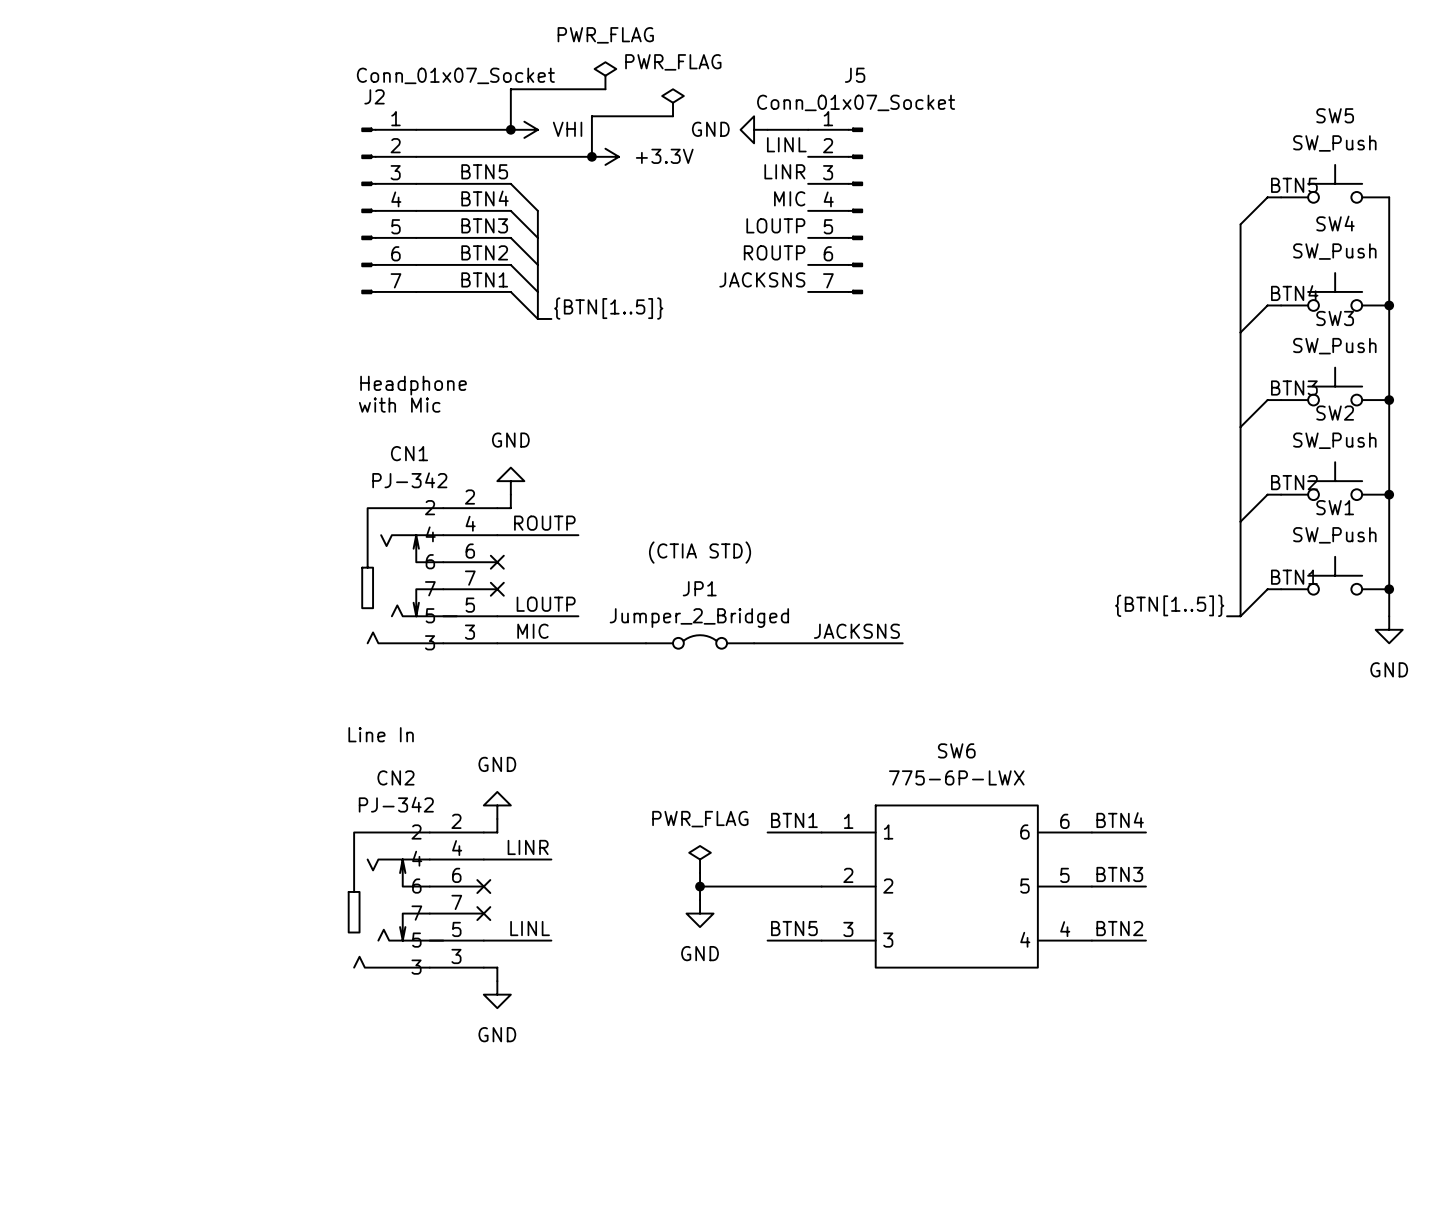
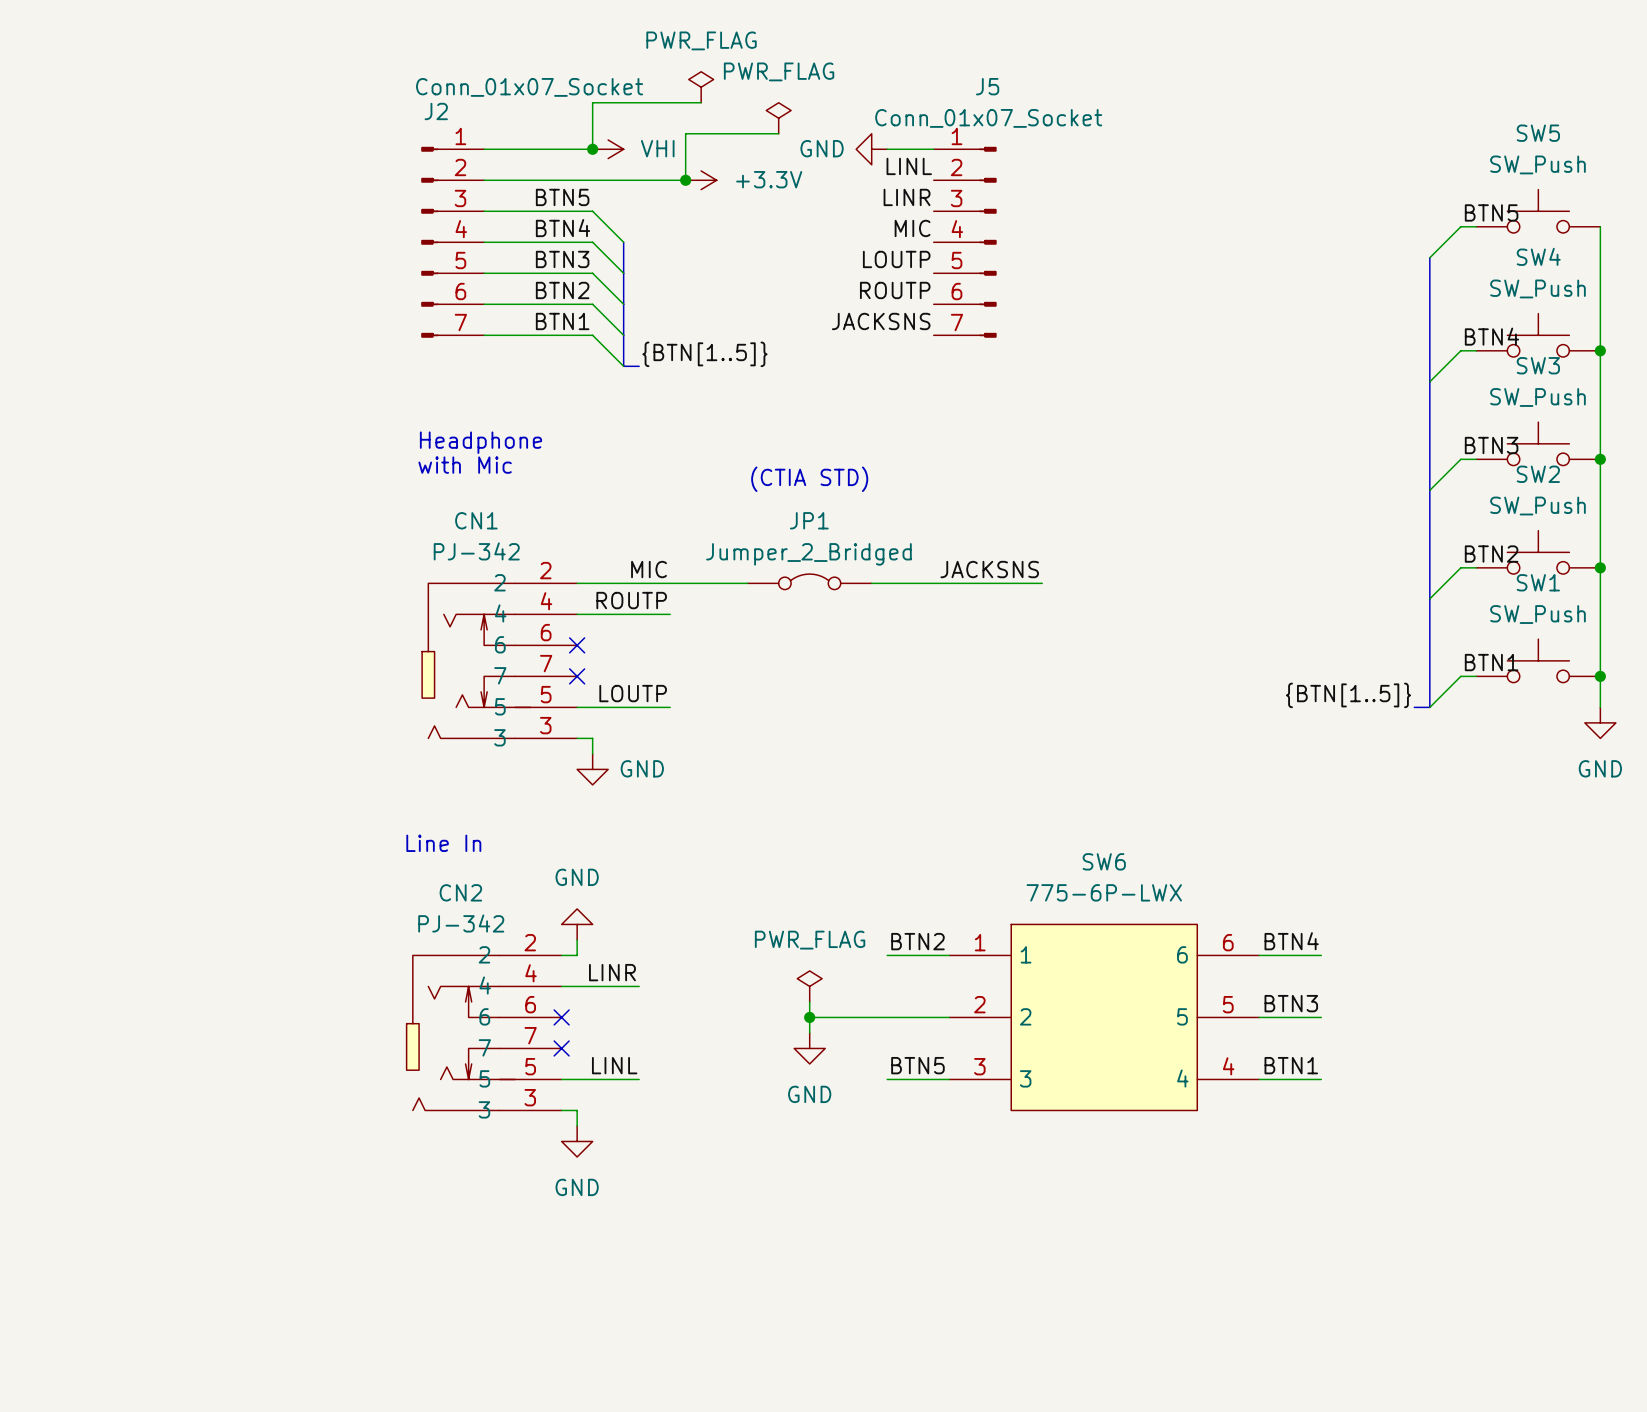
power symbol text position: GND (510, 440) -> GND (642, 768)
power symbol rotation: 0° (510, 481) -> 180° (592, 769)
power symbol position: GND (510, 481) -> GND (592, 769)
wire: (510, 494) (510, 508) -> (747, 583) (592, 583)
text position: (CTIA STD) (700, 552) -> (CTIA STD) (809, 479)
label position: MIC (532, 631) -> MIC (649, 569)
label position: JACKSNS (856, 631) -> JACKSNS (989, 569)
JP1 position: (700, 641) -> (809, 581)
wire: (510, 643) (645, 643) -> (592, 738) (592, 753)
wire: (754, 643) (902, 643) -> (871, 583) (1042, 583)
label: BTN1 (794, 820) -> BTN2 (917, 941)
label: BTN2 (1119, 928) -> BTN1 (1291, 1065)

